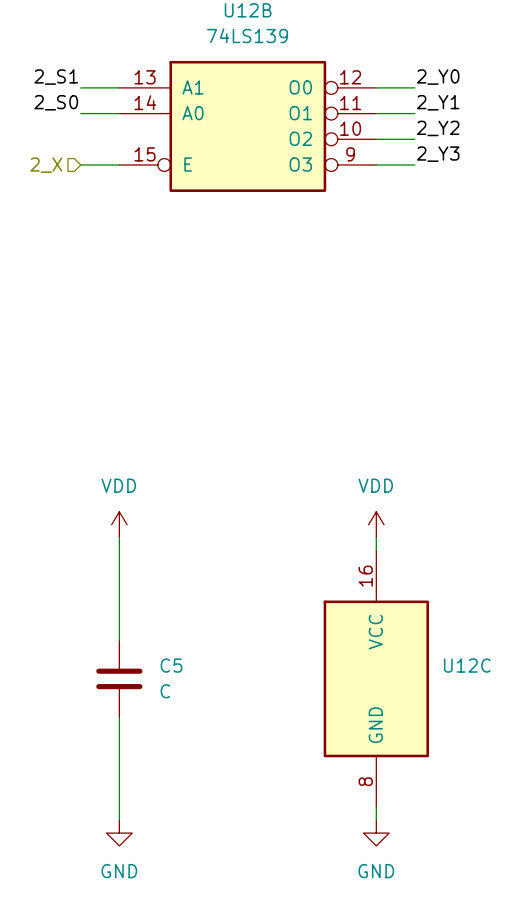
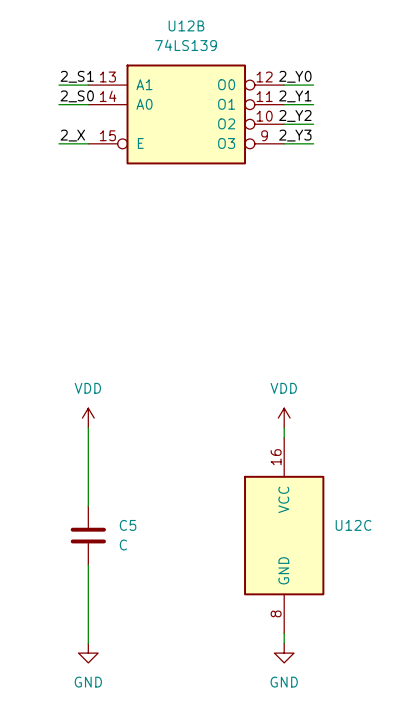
label position: 2_S1 (56, 77) -> 2_S1 (77, 76)
label position: 2_Y0 (438, 77) -> 2_Y0 (295, 76)
label position: 2_S0 (56, 102) -> 2_S0 (77, 96)
label position: 2_Y1 (438, 102) -> 2_Y1 (295, 96)
label position: 2_Y2 (438, 128) -> 2_Y2 (295, 115)
label: none -> 2_X (72, 135)
label position: 2_Y3 (438, 154) -> 2_Y3 (295, 135)
hierarchical label: 2_X (46, 165) -> none

